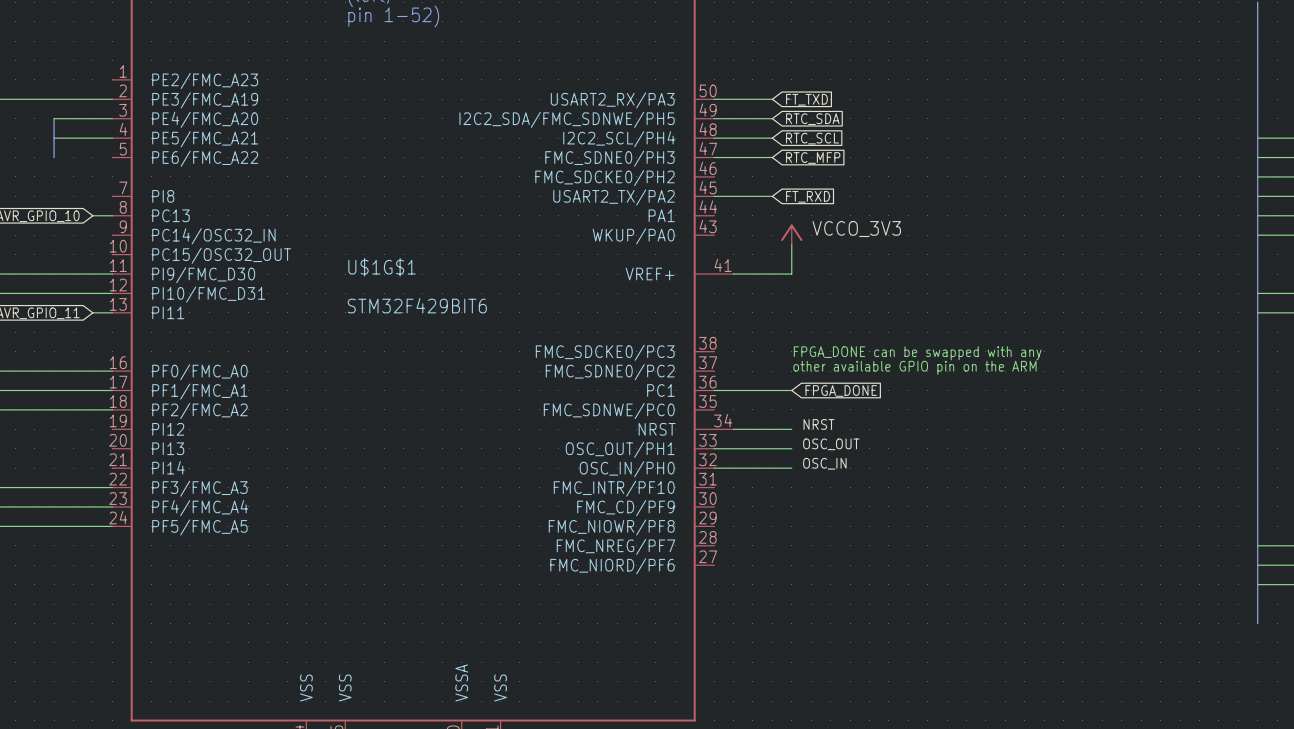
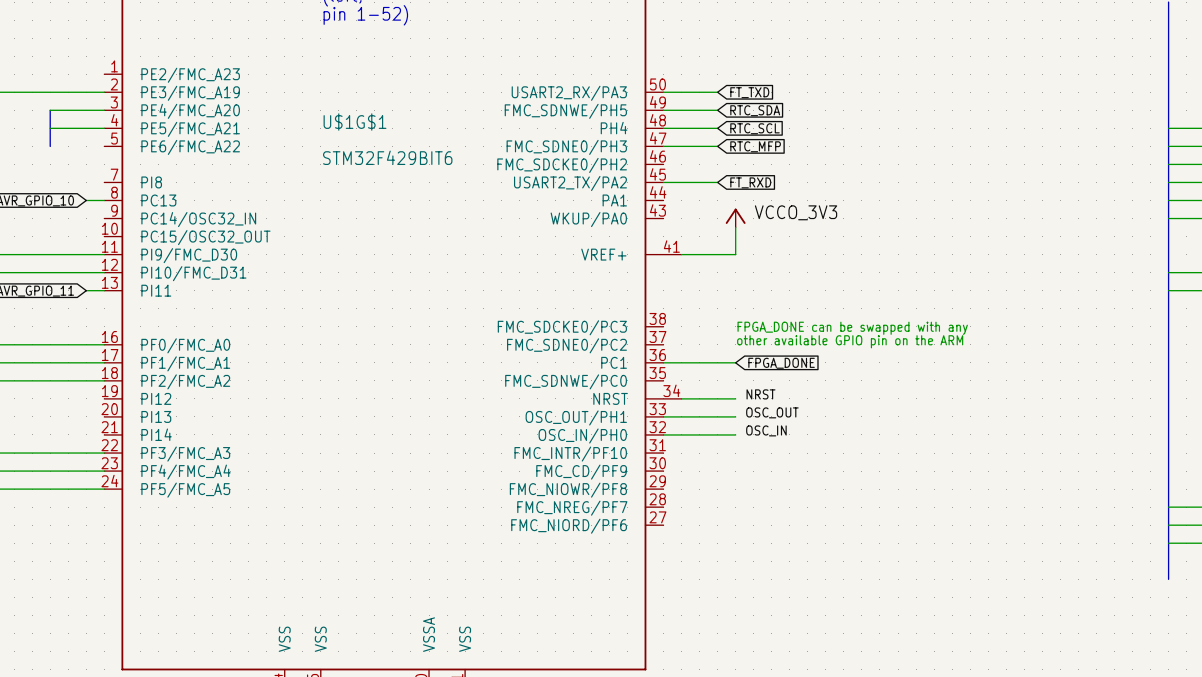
U$1G$1 pin name: I2C2_SDA/FMC_SDNWE/PH5 (567, 119) -> FMC_SDNWE/PH5 (565, 111)
U$1G$1 pin name: I2C2_SCL/PH4 (619, 139) -> PH4 (614, 128)
U$1G$1 name position: U$1G$1 (382, 267) -> U$1G$1 (355, 122)
U$1G$1 value position: STM32F429BIT6 (417, 305) -> STM32F429BIT6 (387, 157)

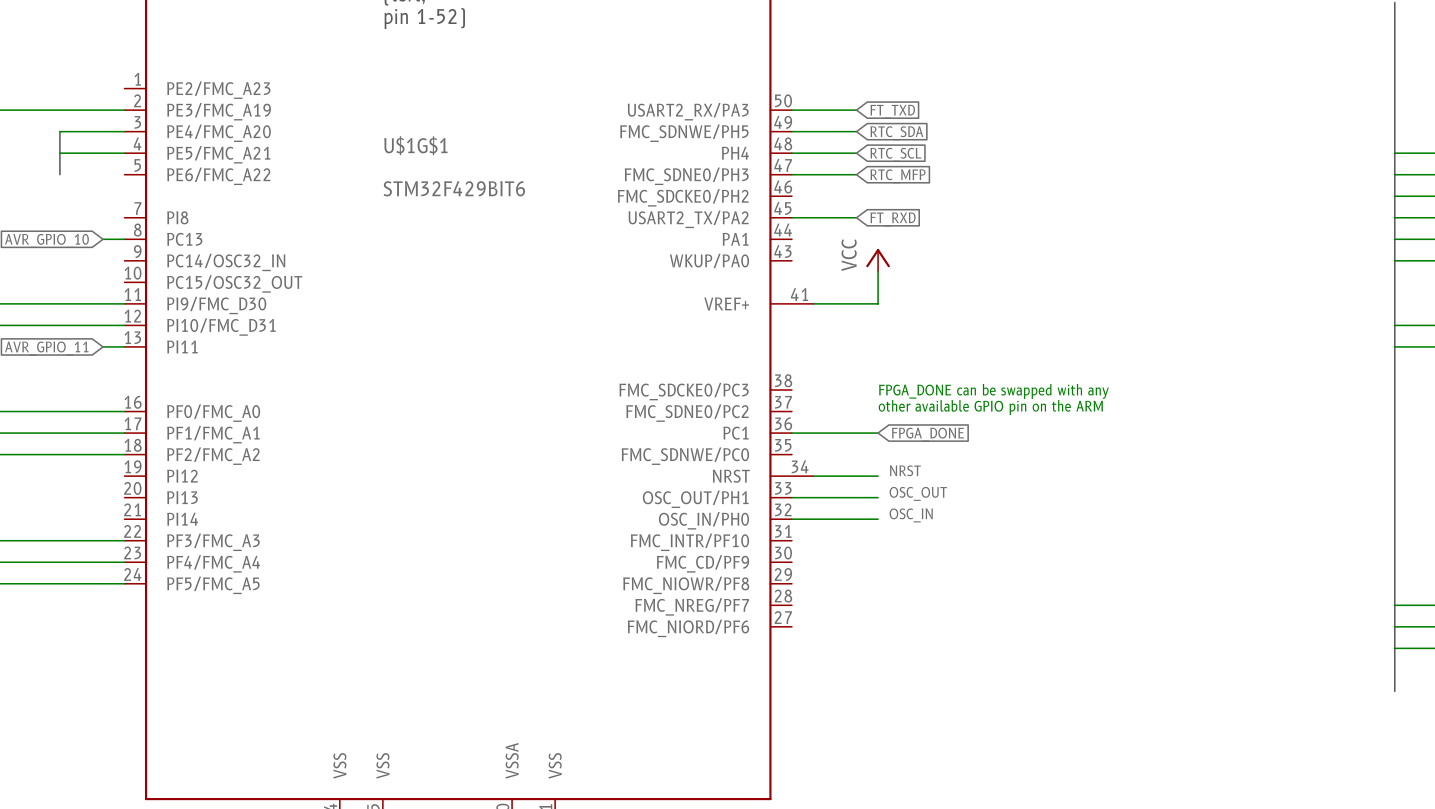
power symbol text: none -> VCC (849, 255)
label: VCCO_3V3 (796, 212) -> none

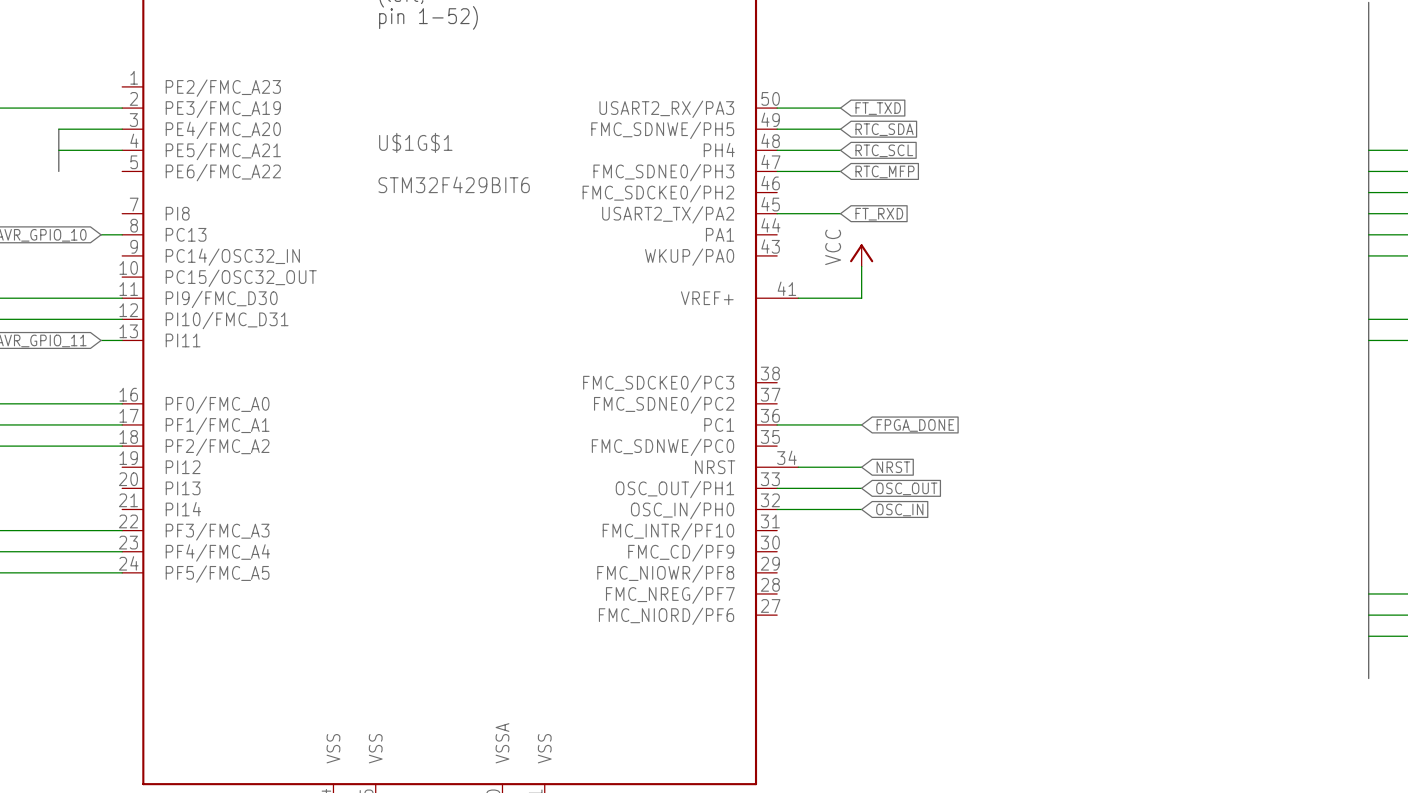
text: FPGA_DONE can be swapped with any (993, 391) -> none
text: other available GPIO pin on the ARM (990, 407) -> none
label: NRST (905, 470) -> none
global label: none -> NRST (893, 467)
label: OSC_OUT (918, 493) -> none
global label: none -> OSC_OUT (906, 488)
label: OSC_IN (911, 515) -> none
global label: none -> OSC_IN (899, 509)

